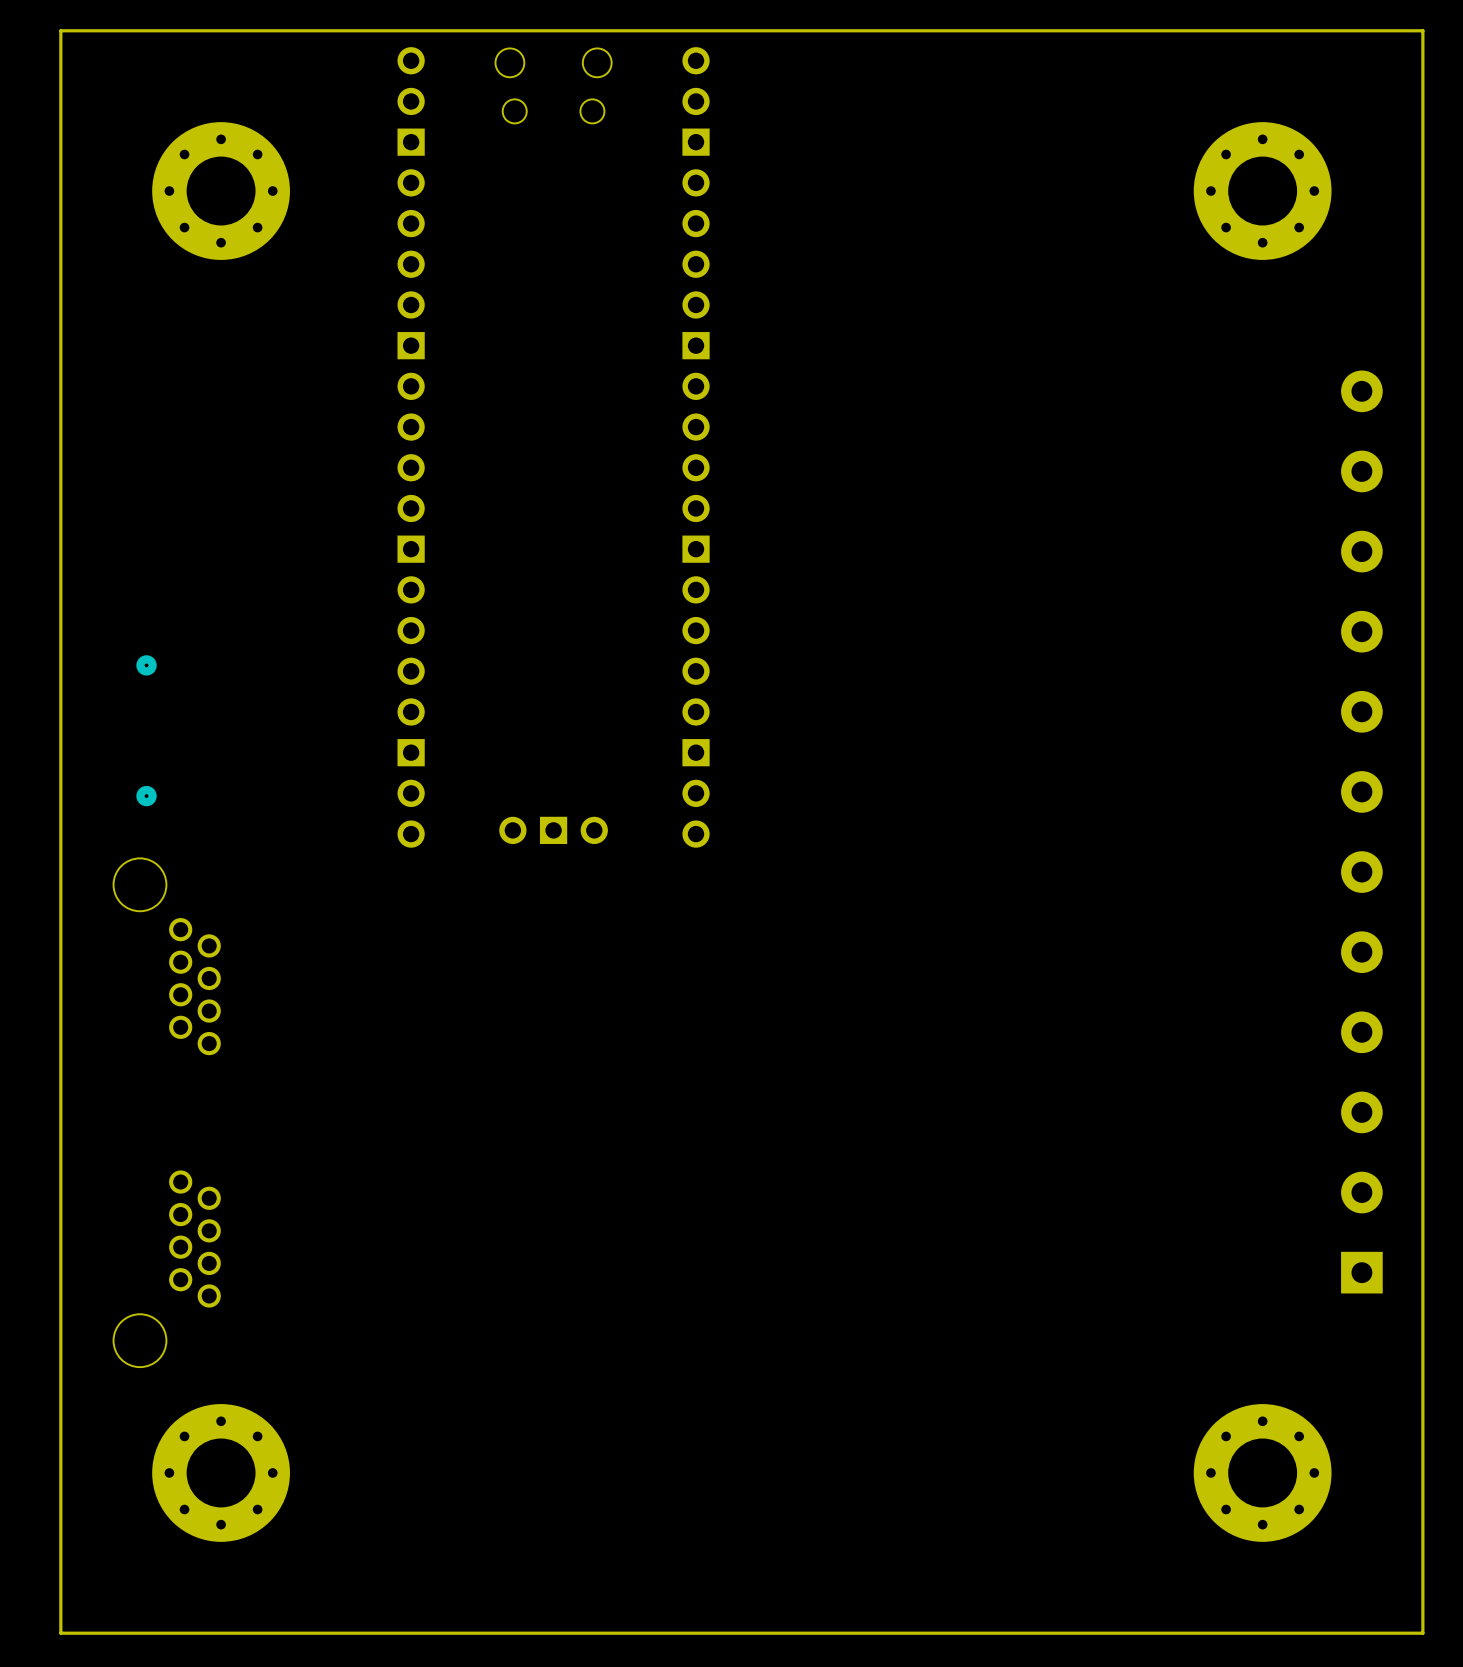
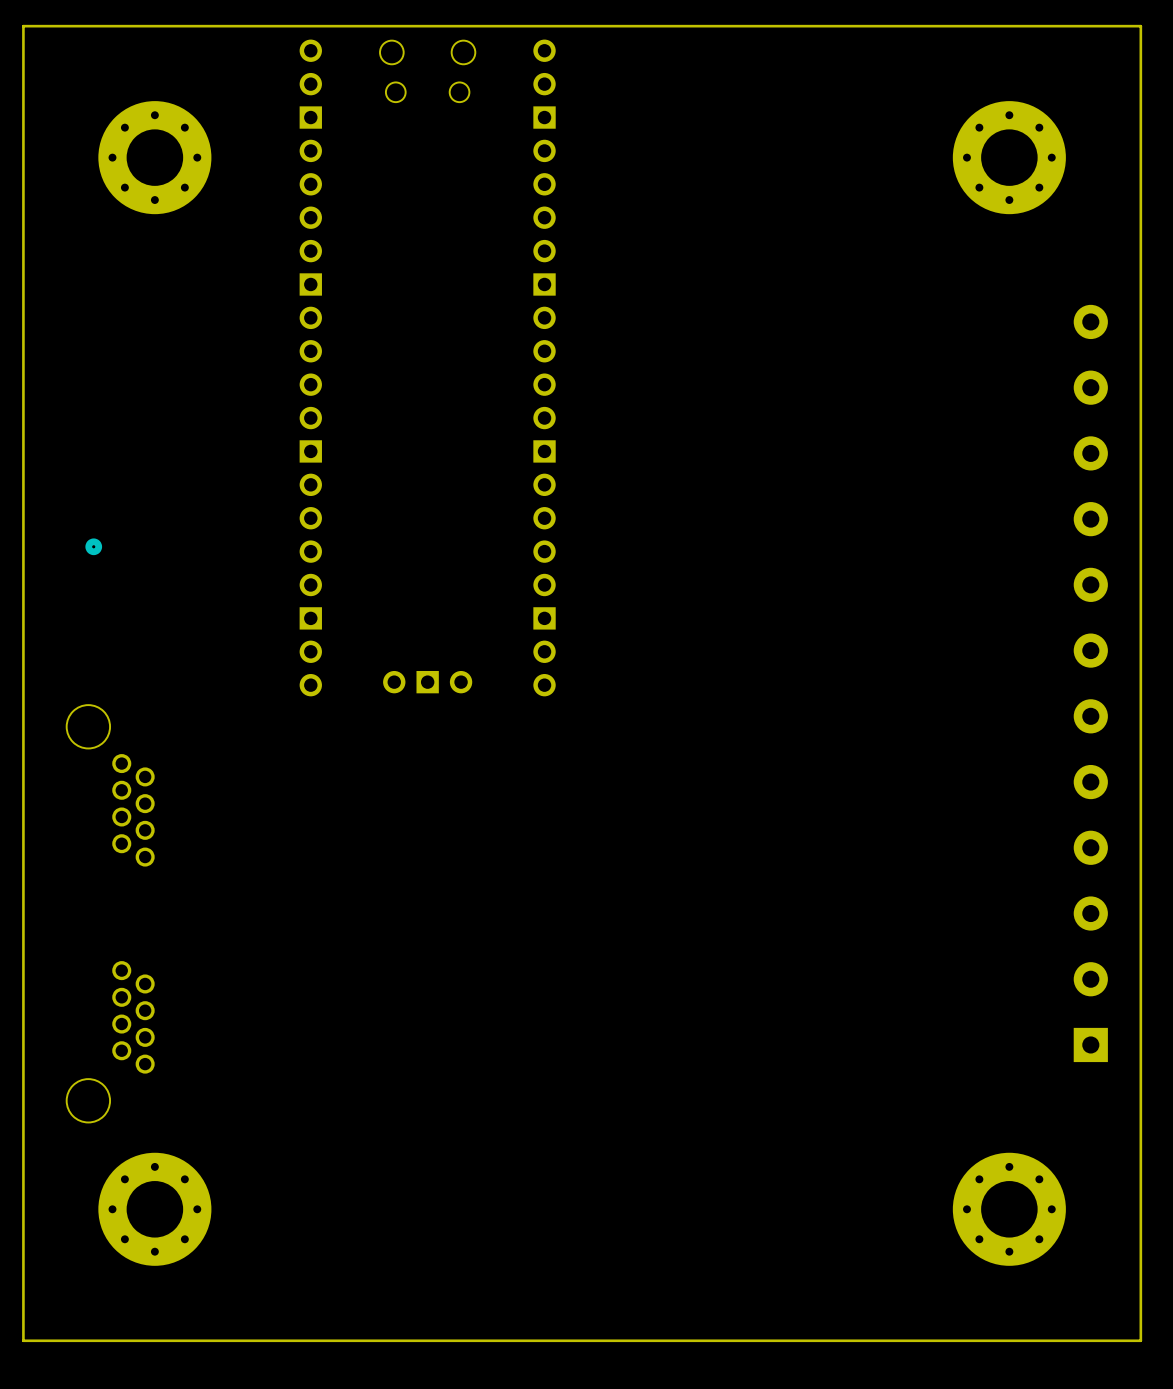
part: (146, 796) -> none

